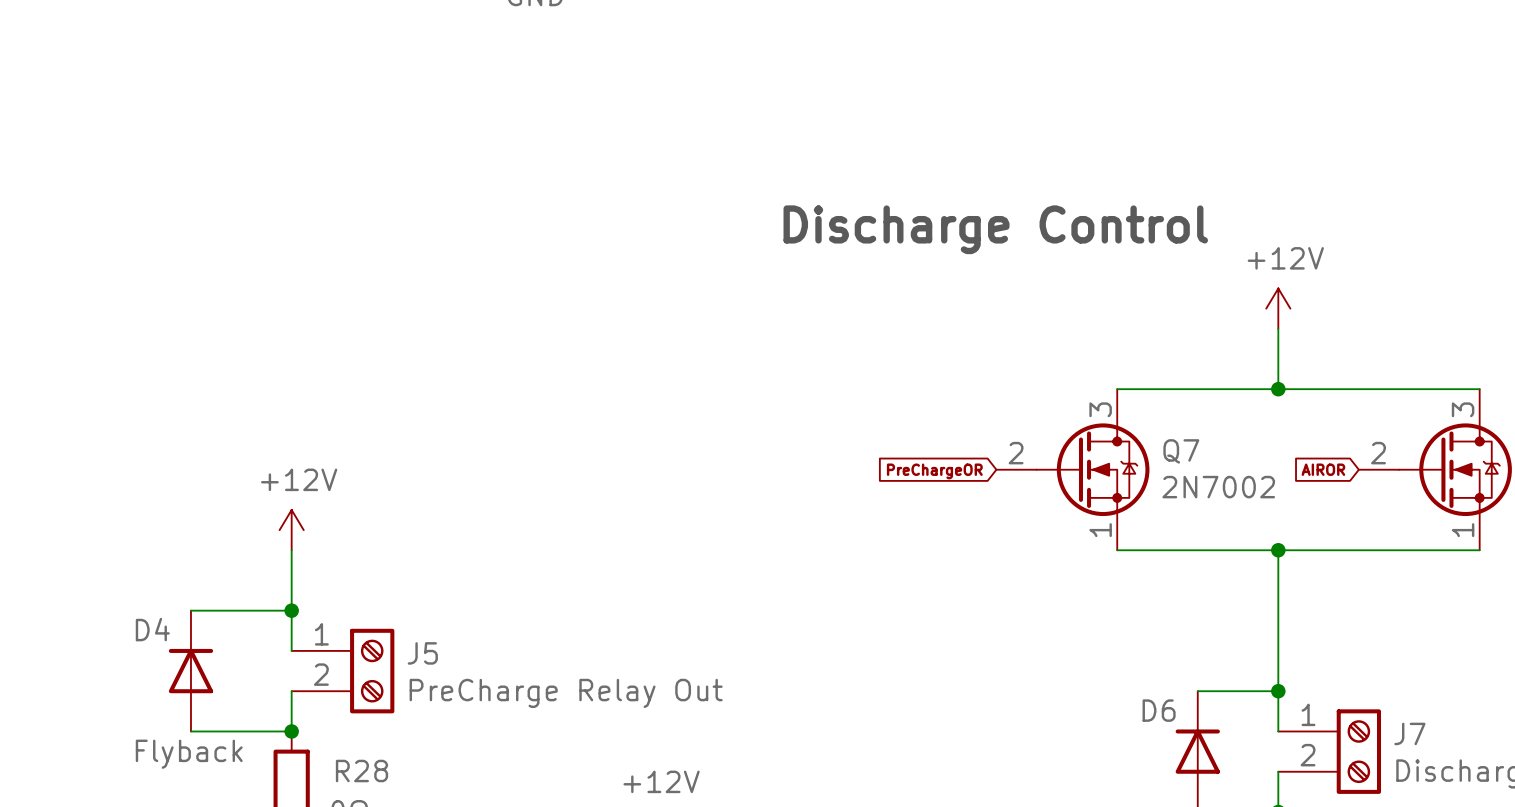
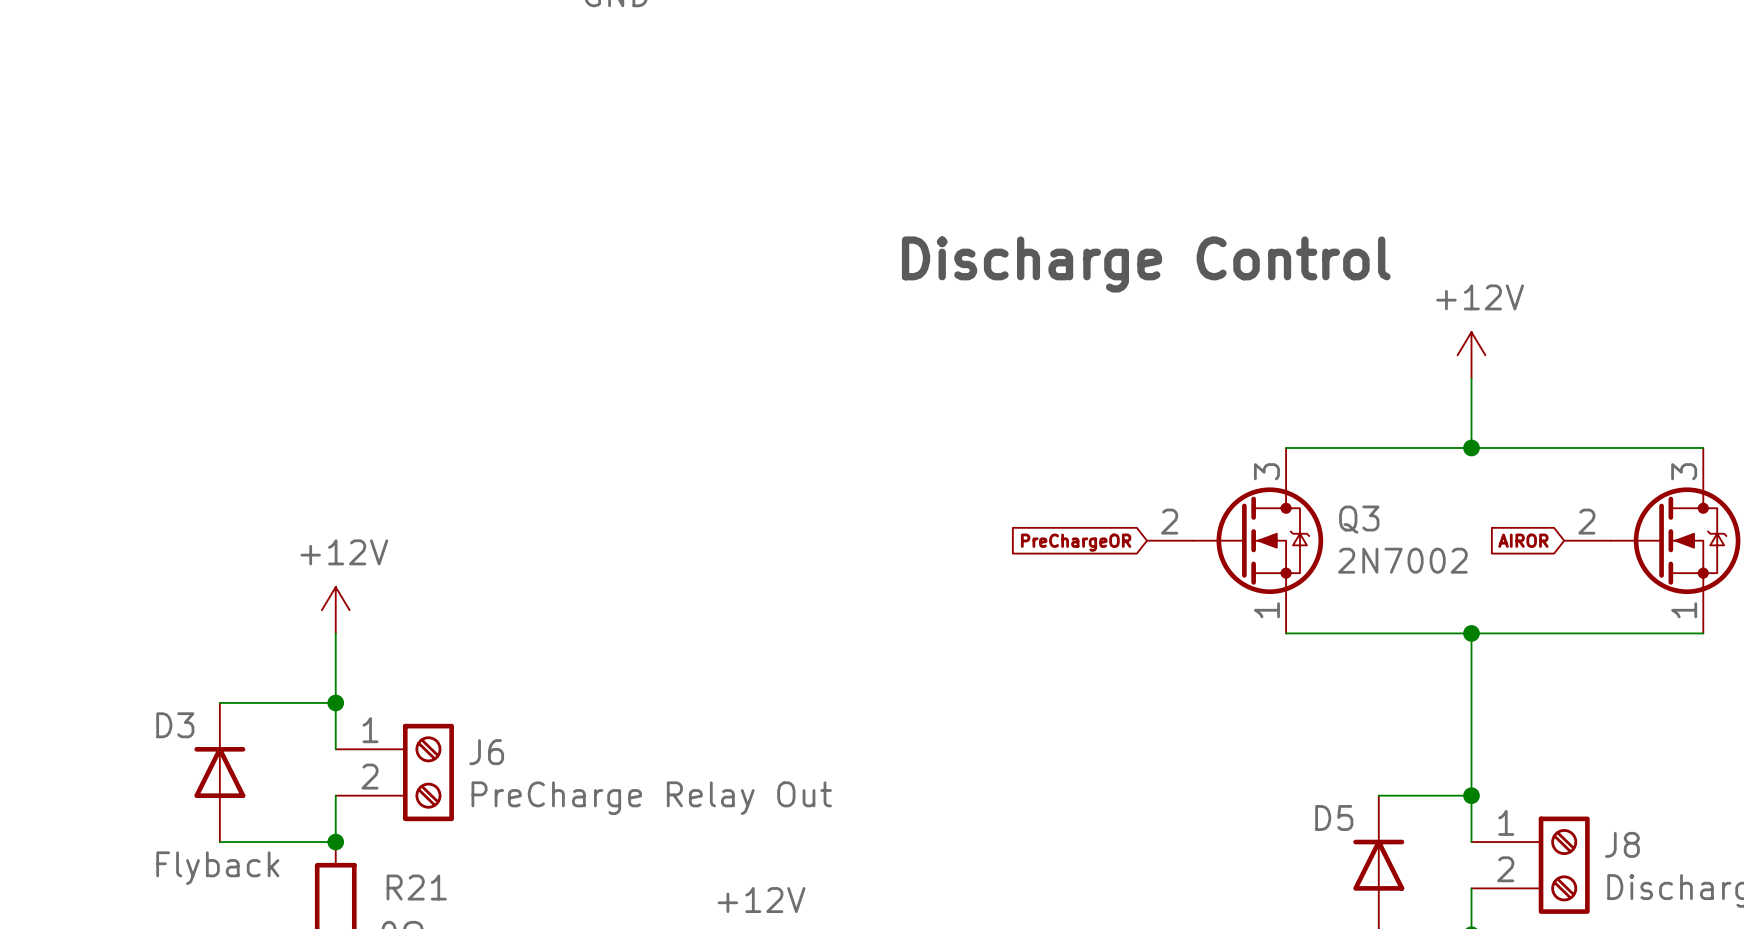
Q7 name: Q7 (1181, 451) -> Q3 (1359, 519)
D4 name: D4 (152, 629) -> D3 (175, 725)
J5 name: J5 (422, 653) -> J6 (486, 752)
D6 name: D6 (1159, 710) -> D5 (1334, 817)
J7 name: J7 (1409, 733) -> J8 (1622, 844)
R28 name: R28 (361, 771) -> R21 (416, 887)

